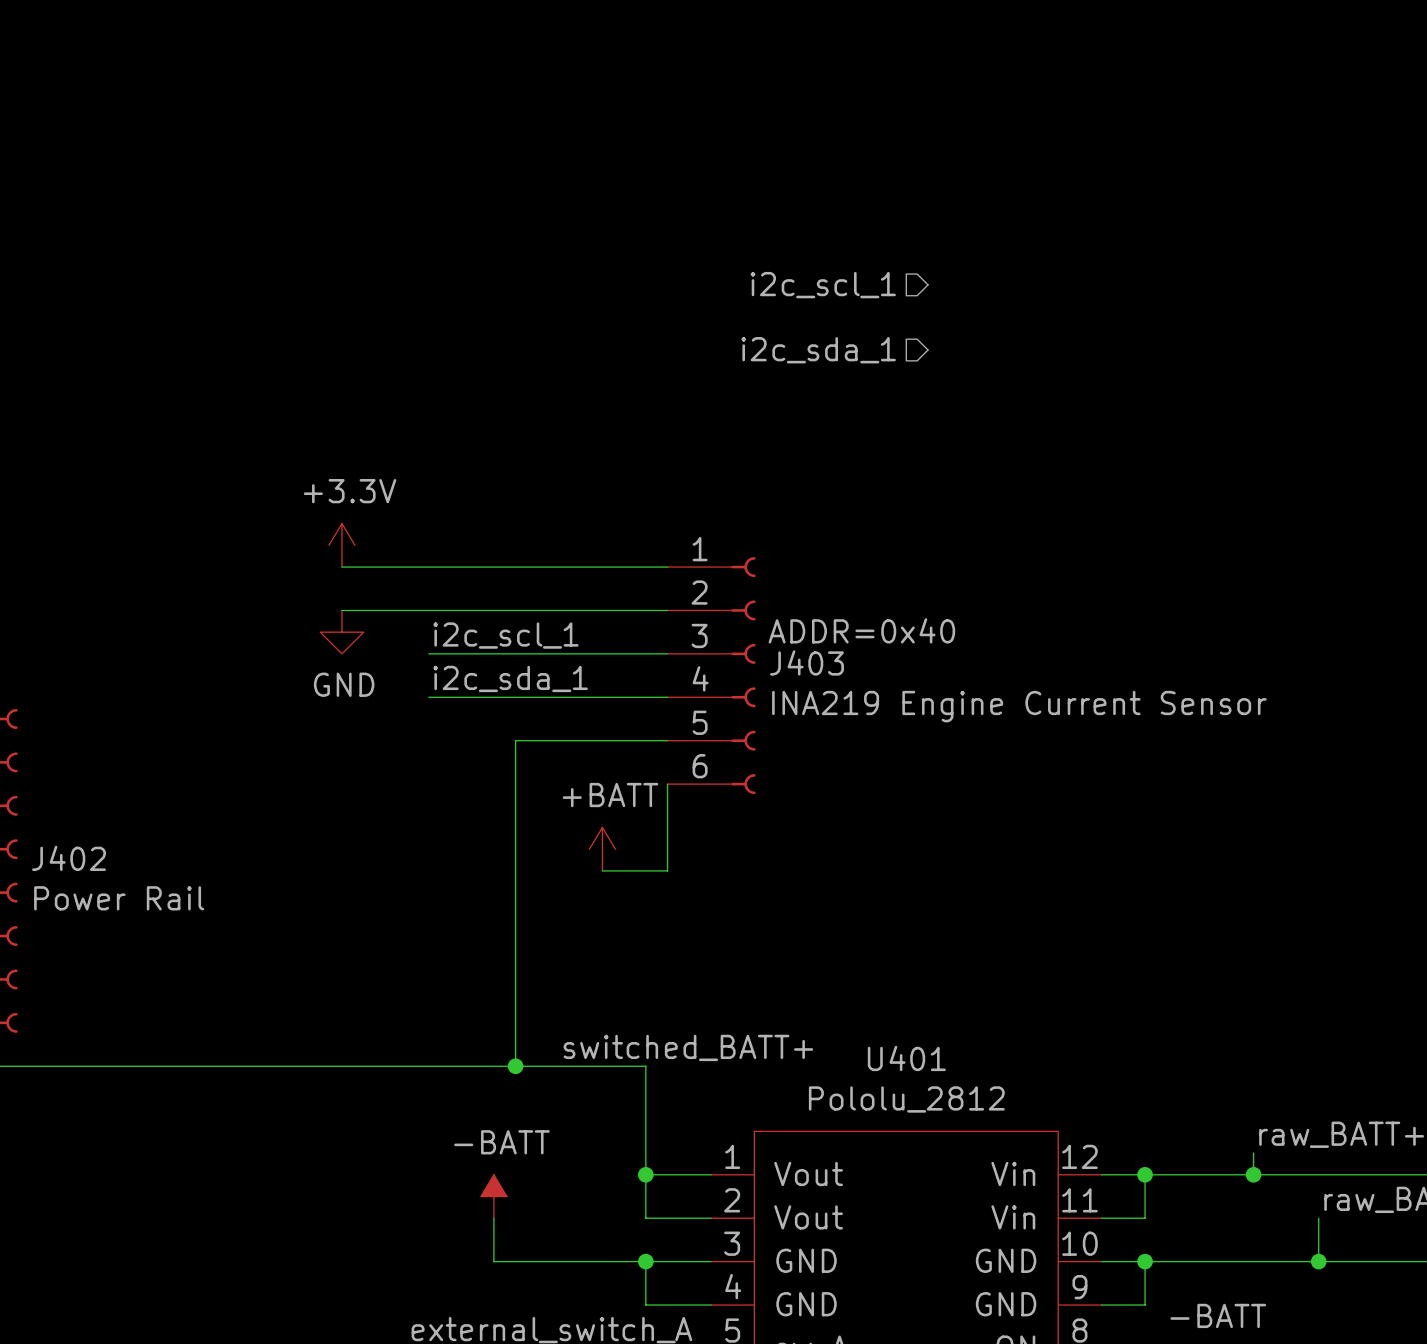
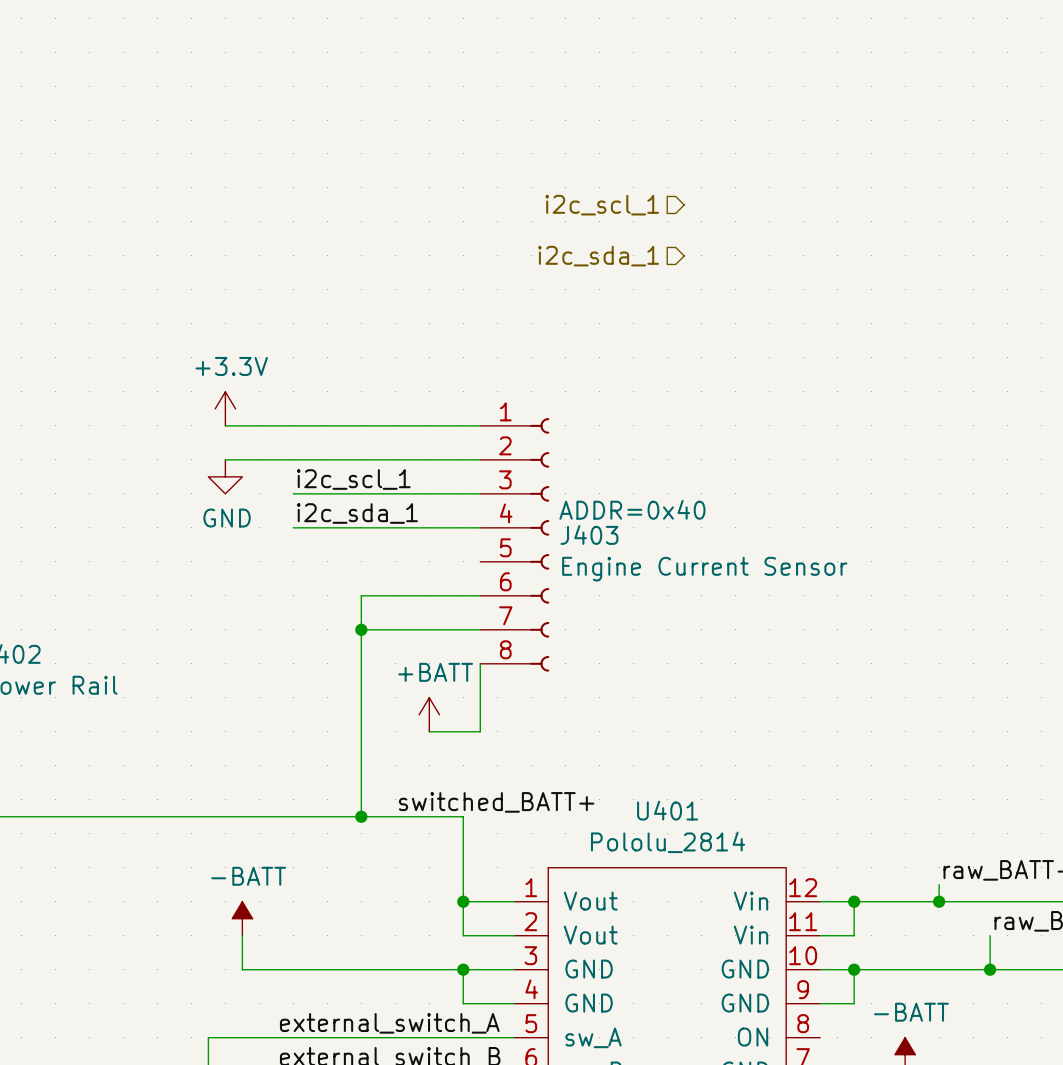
J403 symbol: [667, 557, 756, 795] -> [480, 418, 550, 672]
J403 value: INA219 Engine Current Sensor (1019, 706) -> Engine Current Sensor (704, 569)
wire: (667, 740) (515, 740) (515, 784) -> (480, 595) (361, 595)
wire: (667, 784) (667, 870) (602, 870) -> (480, 663) (480, 731) (429, 731)
wire: none -> (361, 629) (480, 629)
junction: none -> (361, 629)
power symbol position: +BATT (602, 849) -> +BATT (429, 714)
U401 value: Pololu_2812 (906, 1099) -> Pololu_2814 (668, 842)
power symbol position: -BATT (493, 1196) -> -BATT (242, 918)
wire: (493, 1218) (493, 1261) -> (242, 935) (242, 969) (344, 969)

